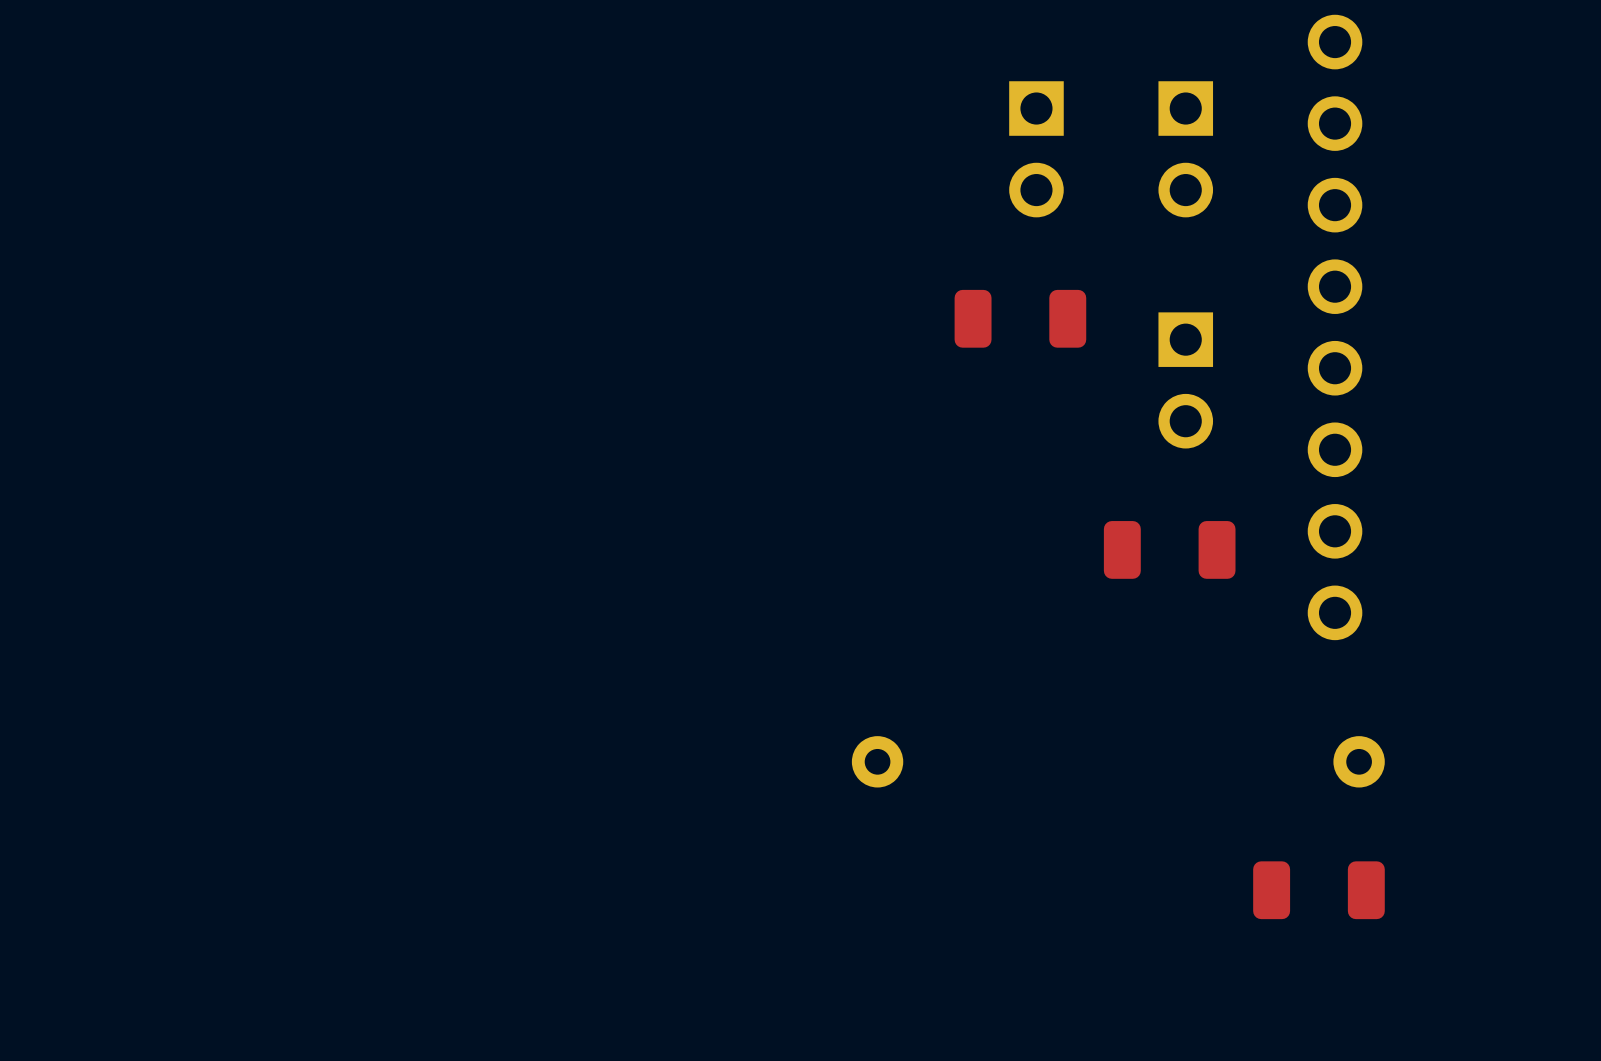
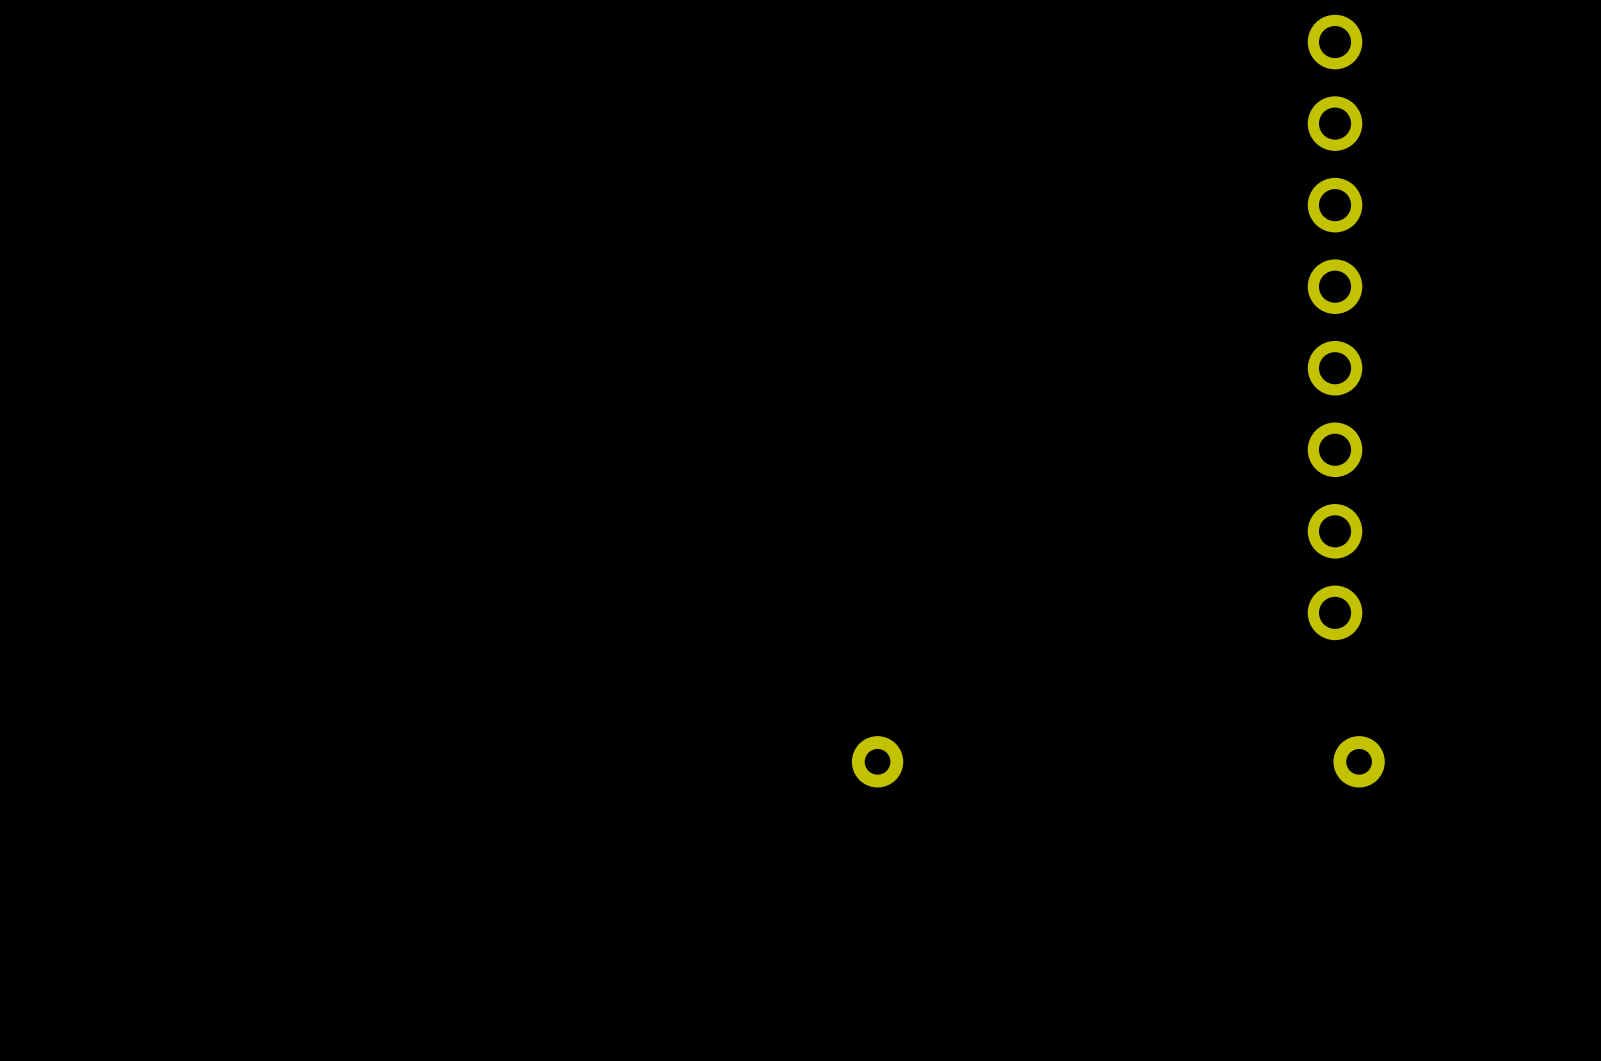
part: (1036, 149) -> none
part: (1185, 149) -> none
part: (1020, 318) -> none
part: (1185, 380) -> none
part: (1169, 549) -> none
part: (1318, 890) -> none

